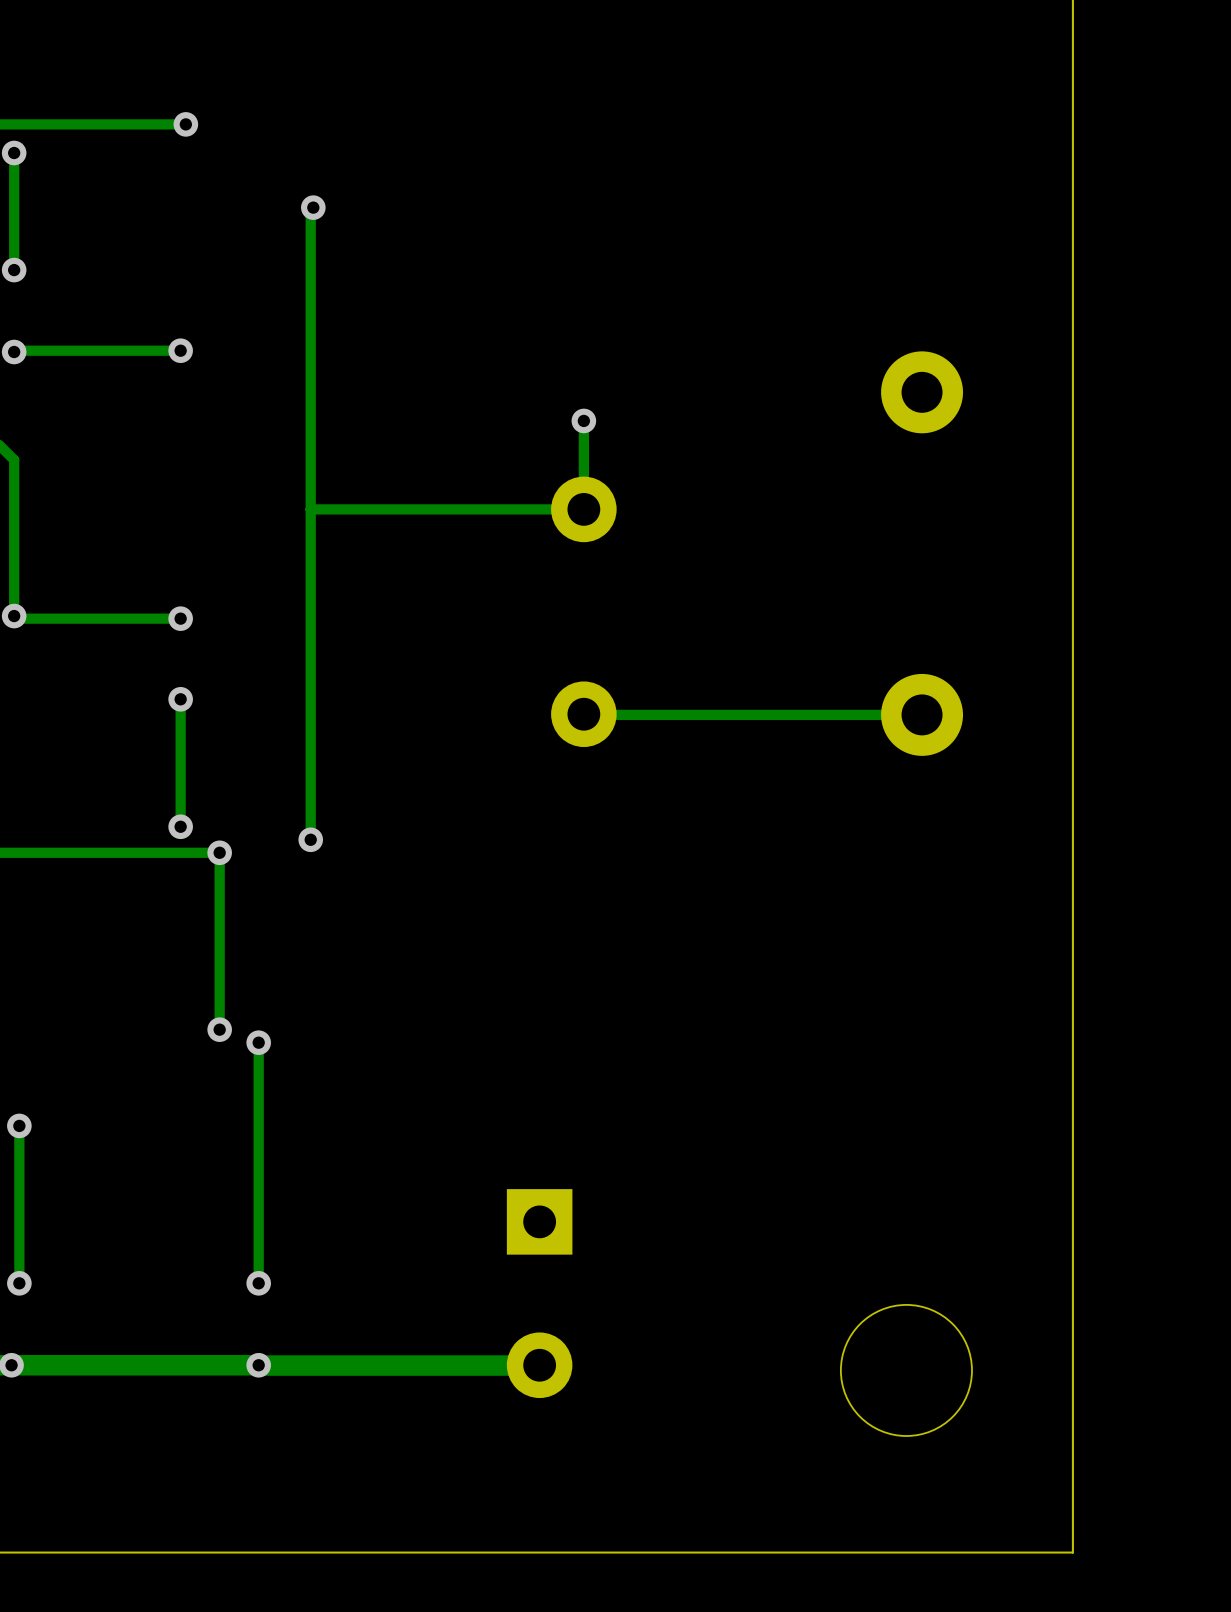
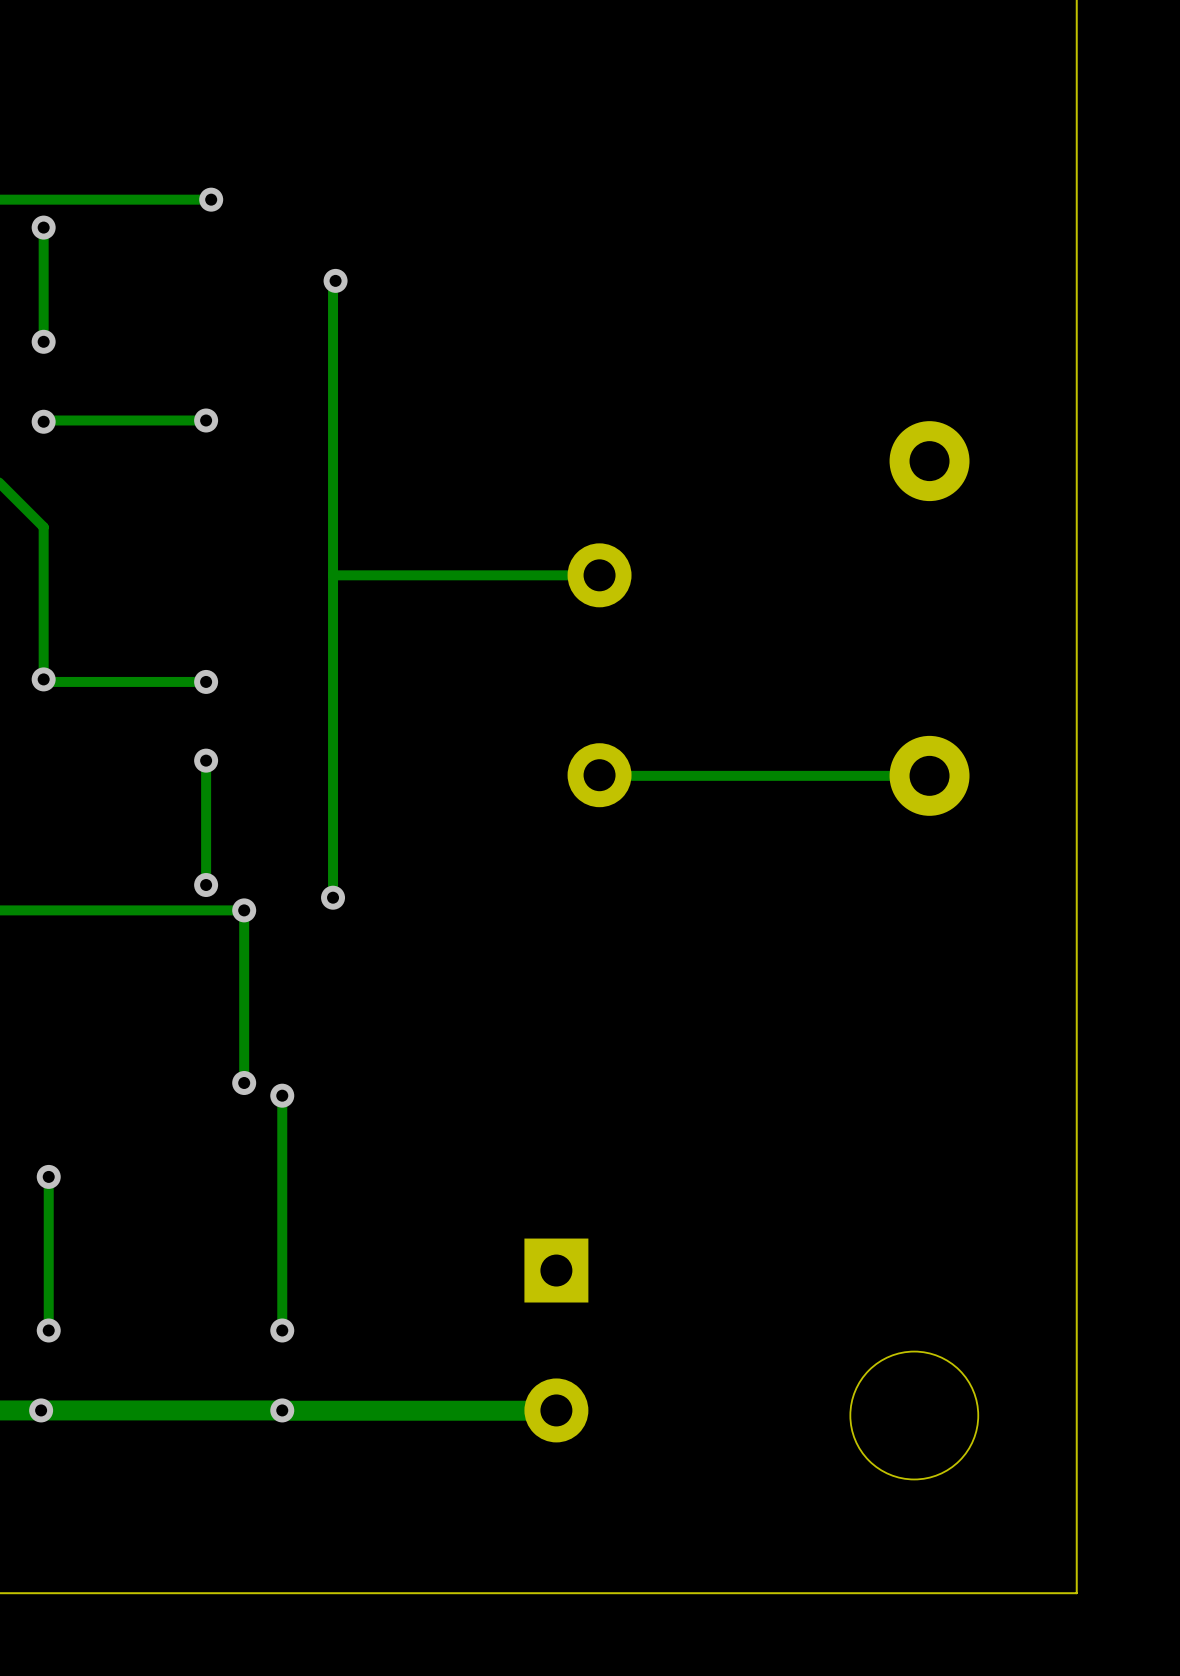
track: (583, 420) (583, 509) -> none
via: (583, 420) -> none

